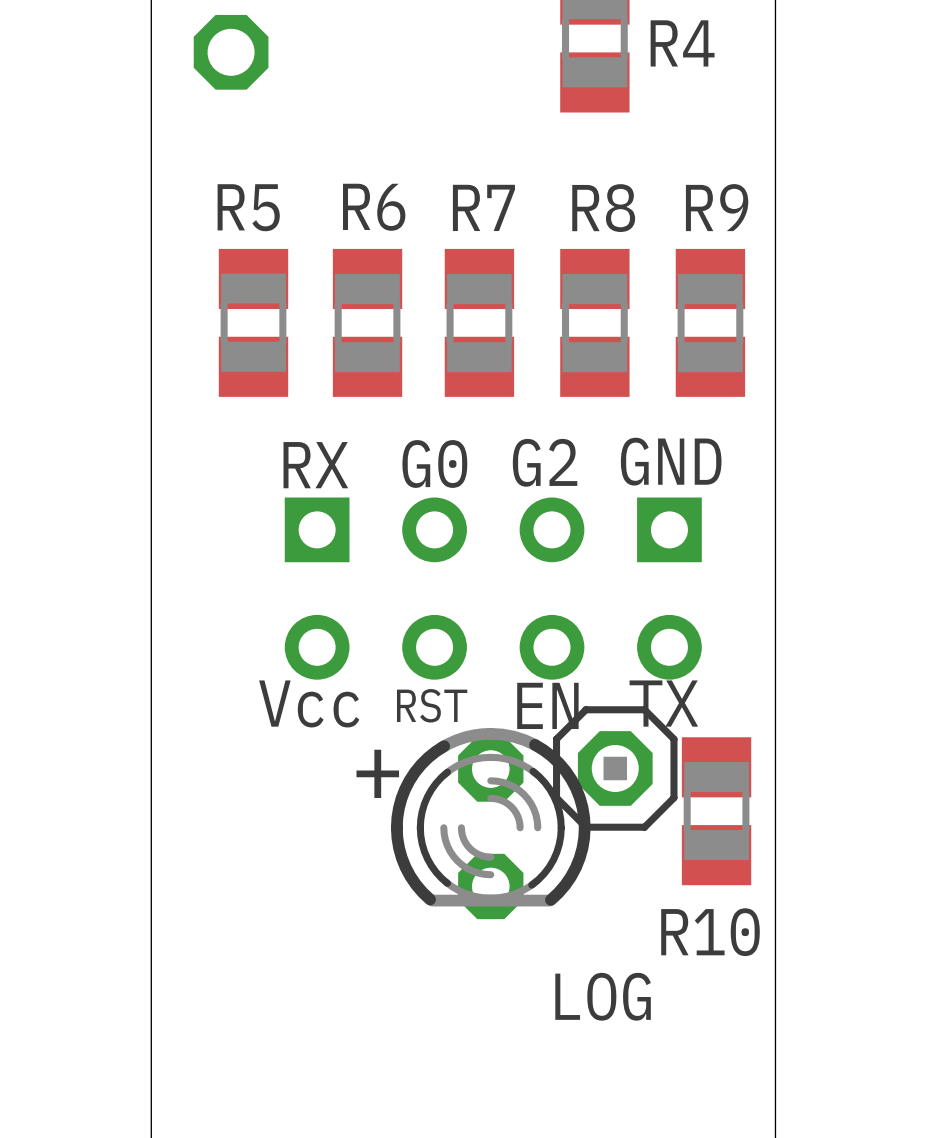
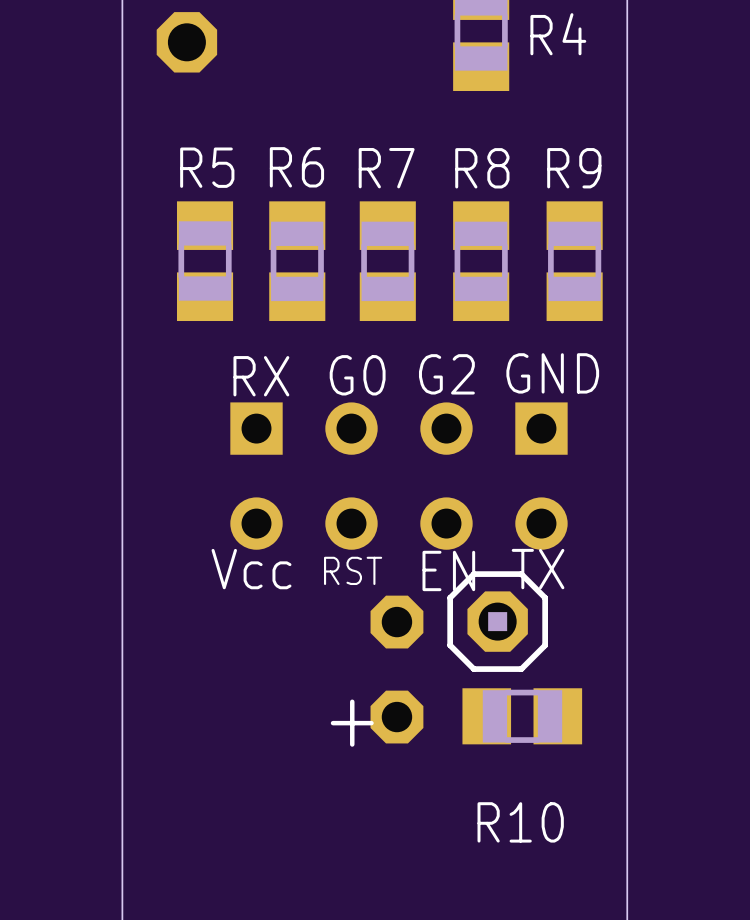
text position: + (377, 773) -> + (352, 723)
R10 rotation: 0° (716, 811) -> 90° clockwise (522, 716)
R10 position: (716, 811) -> (522, 716)
part side: top (490, 823) -> bottom (396, 669)
LOG name: LOG (603, 996) -> none

